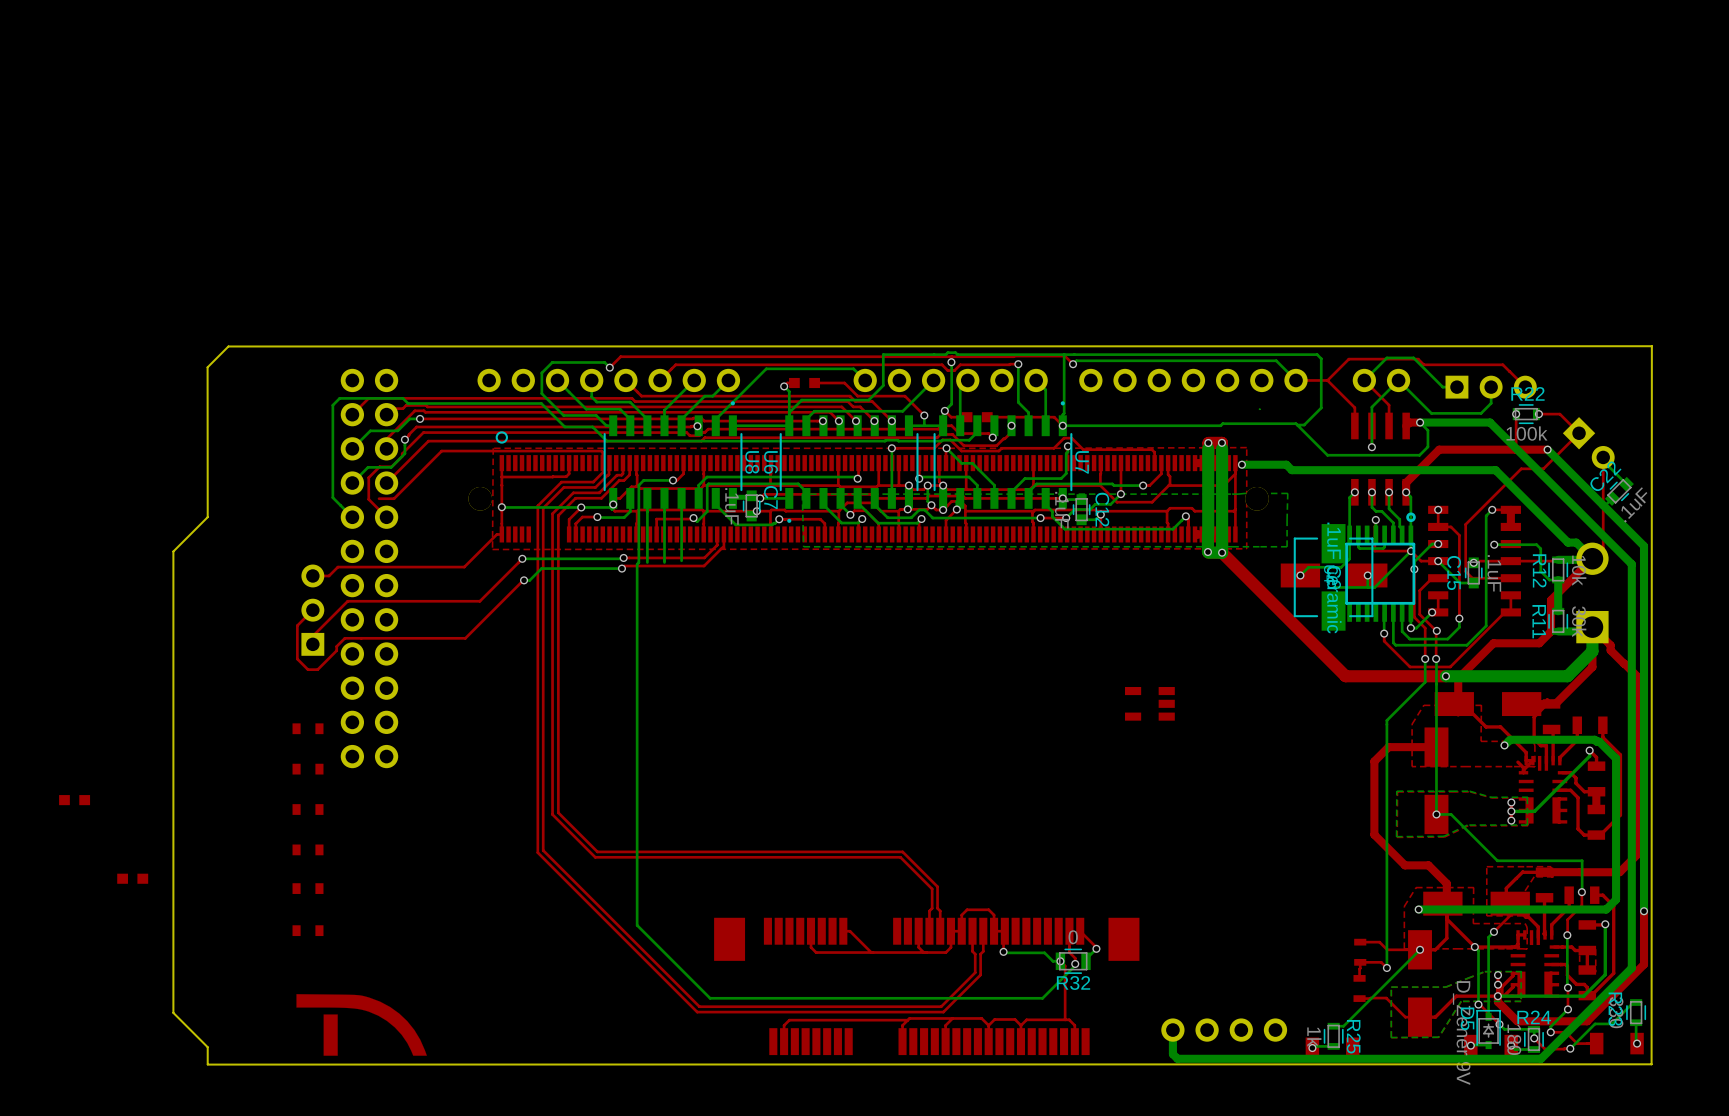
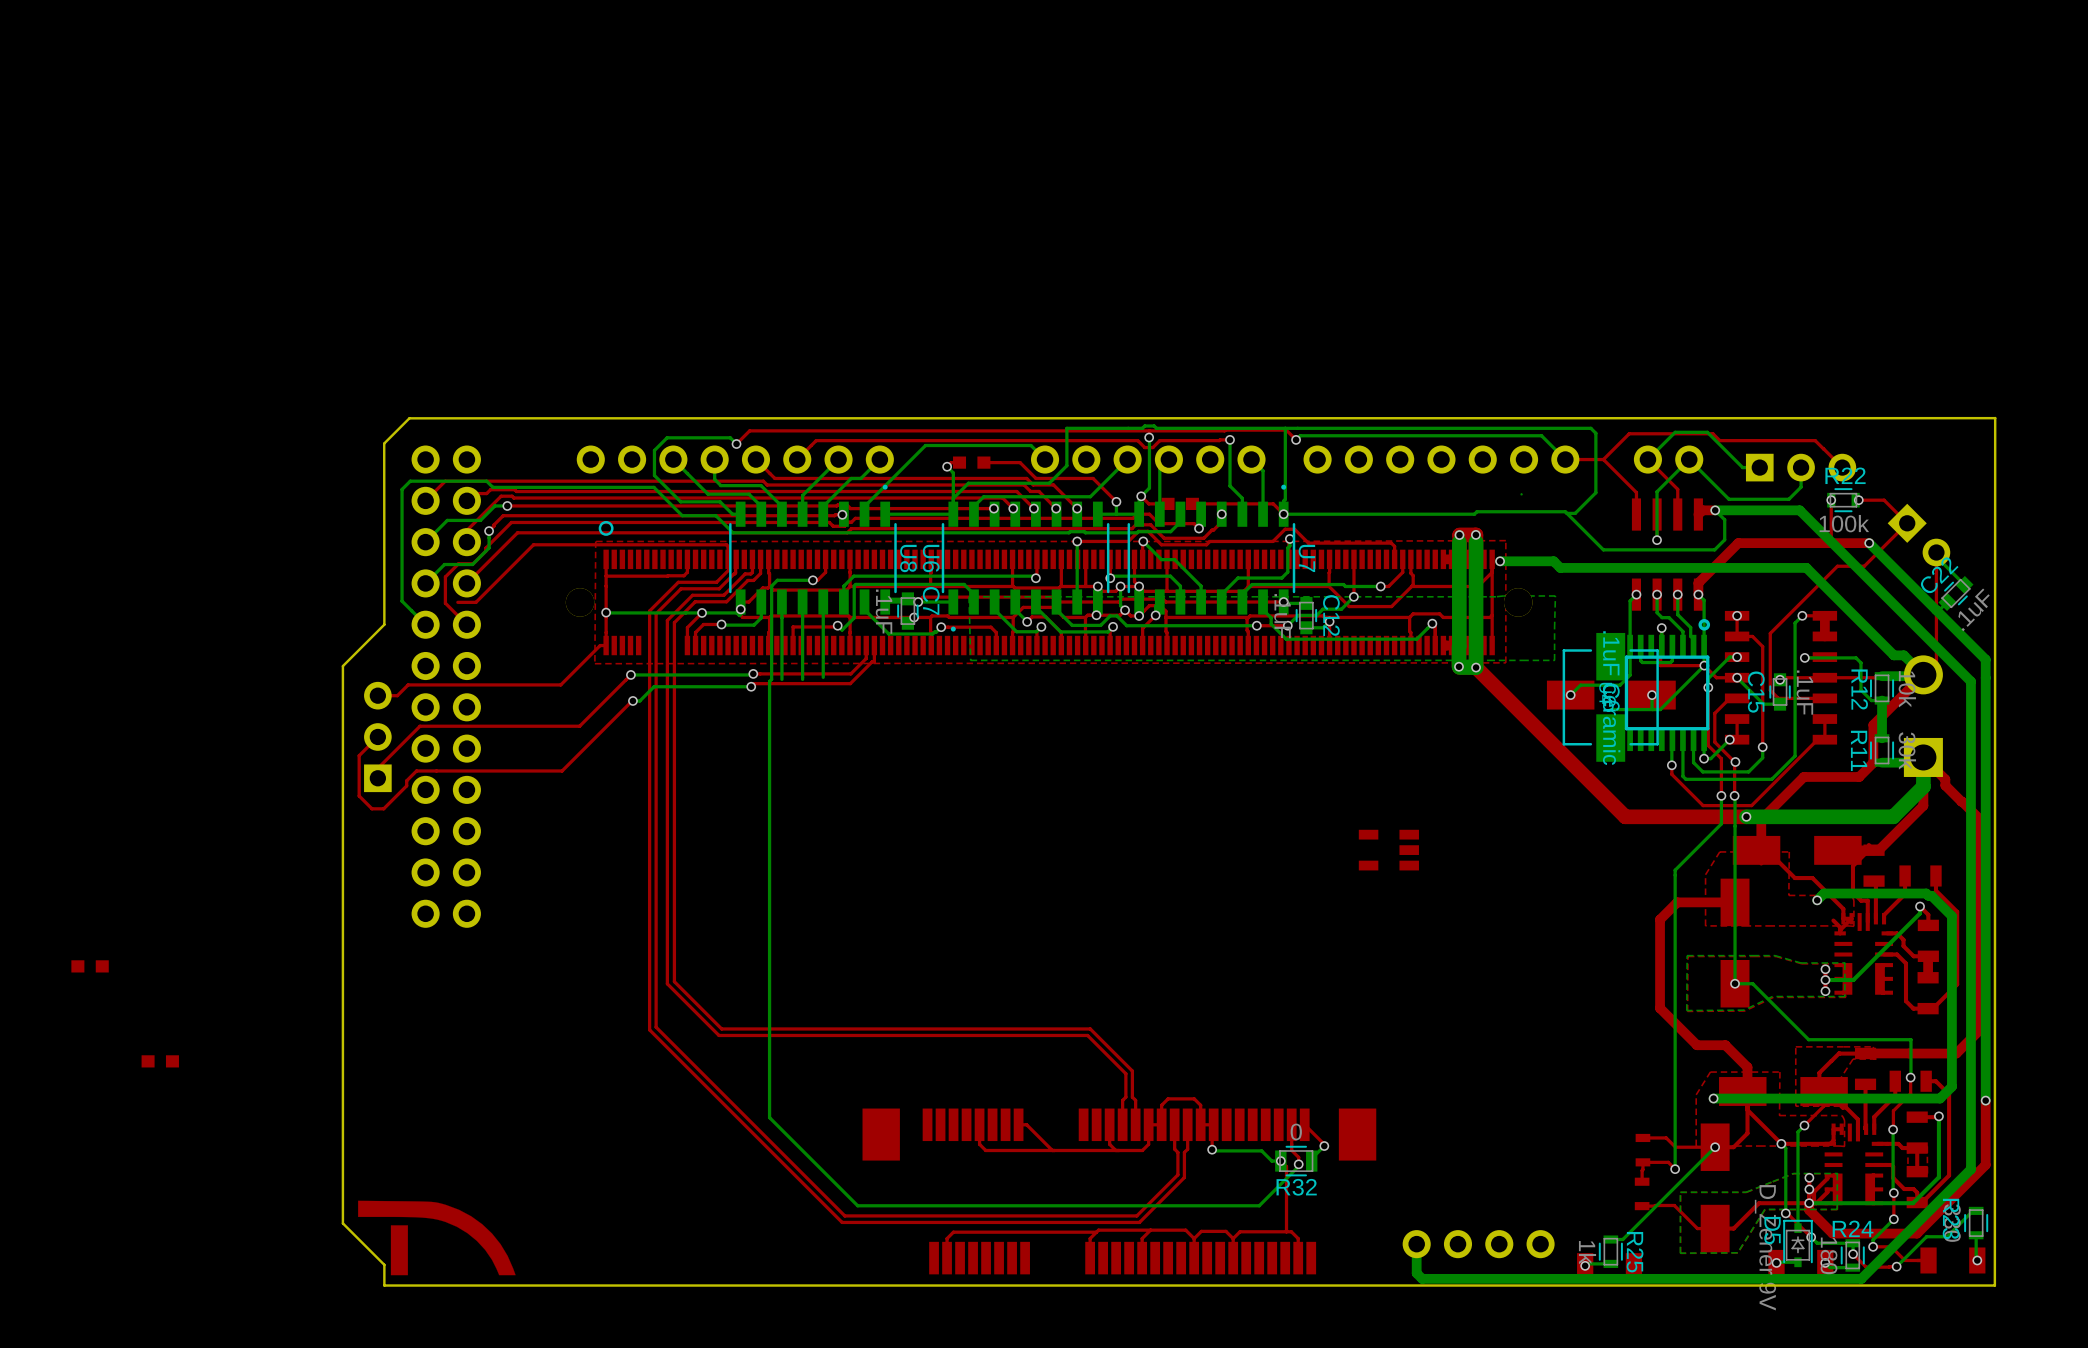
board edge: (228, 346) (207, 367) (207, 517) (173, 551) (173, 1012) (207, 1047) (207, 1064) -> none
board edge: (1651, 346) (228, 346) -> (1995, 418) (409, 418) (384, 443)
part: (308, 728) -> none
part: (308, 769) -> none
part: (308, 809) -> none
part: (308, 849) -> none
part: (308, 888) -> none
part: (308, 930) -> none
board edge: (1651, 1064) (207, 1064) -> (1994, 1285) (384, 1285) (384, 1264) (342, 1223) (342, 666) (384, 624) (384, 443)

